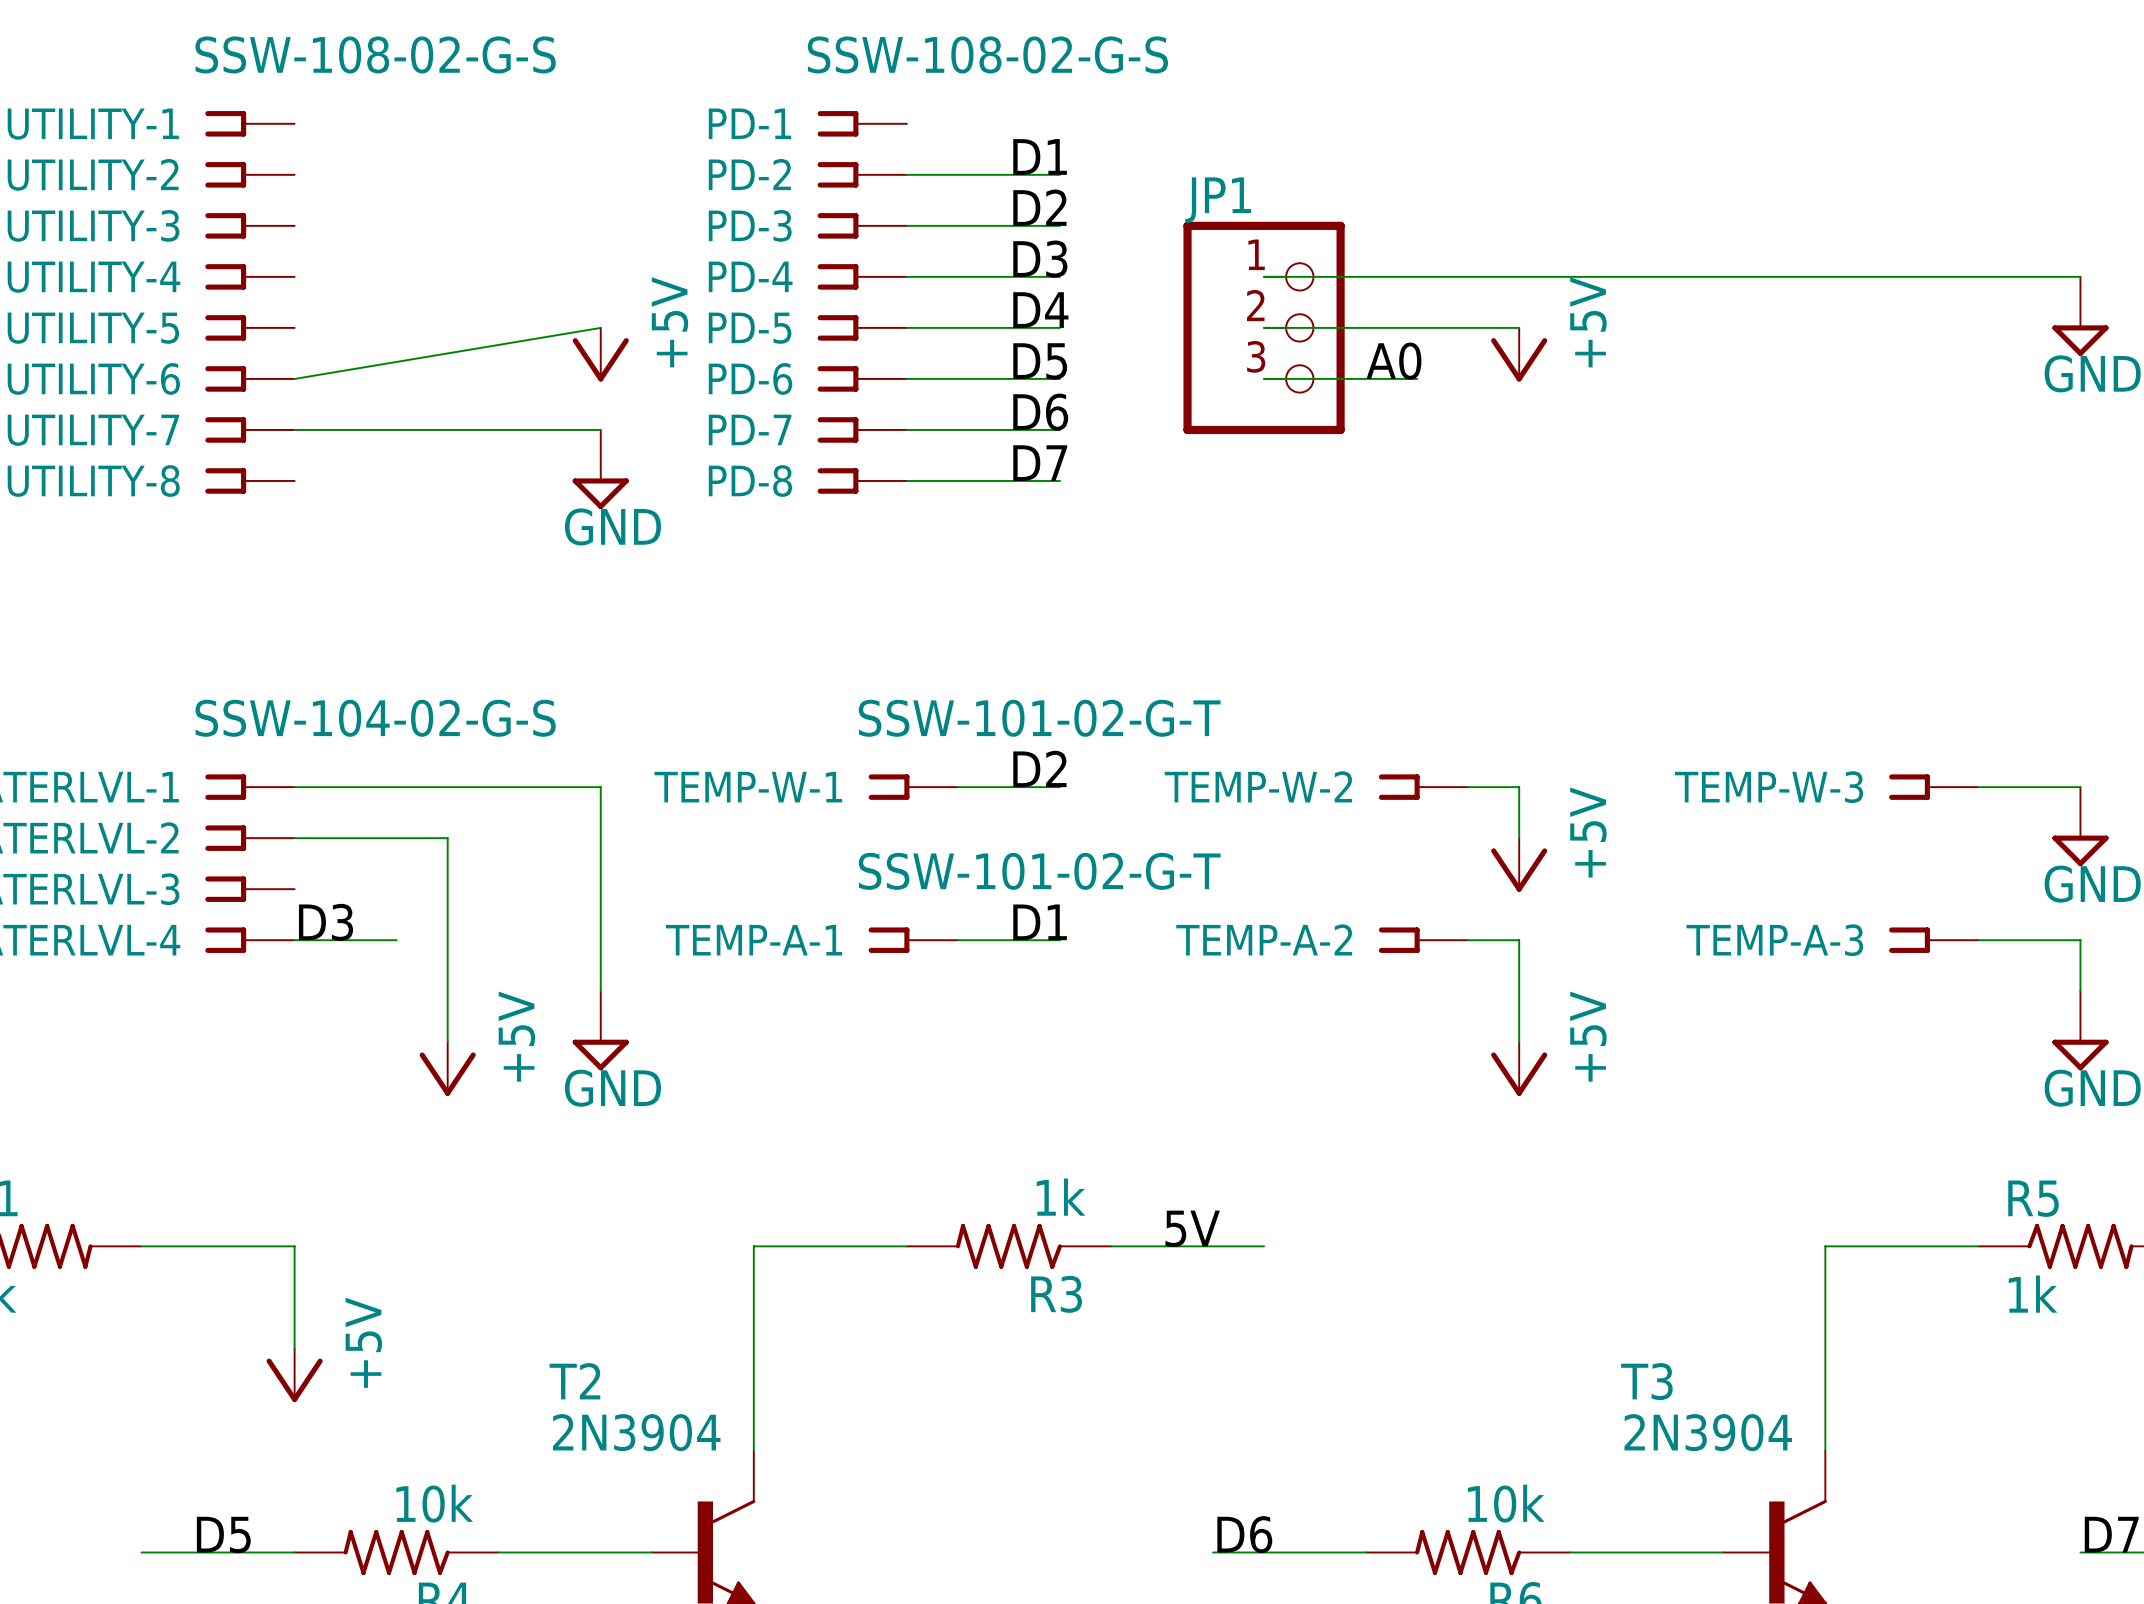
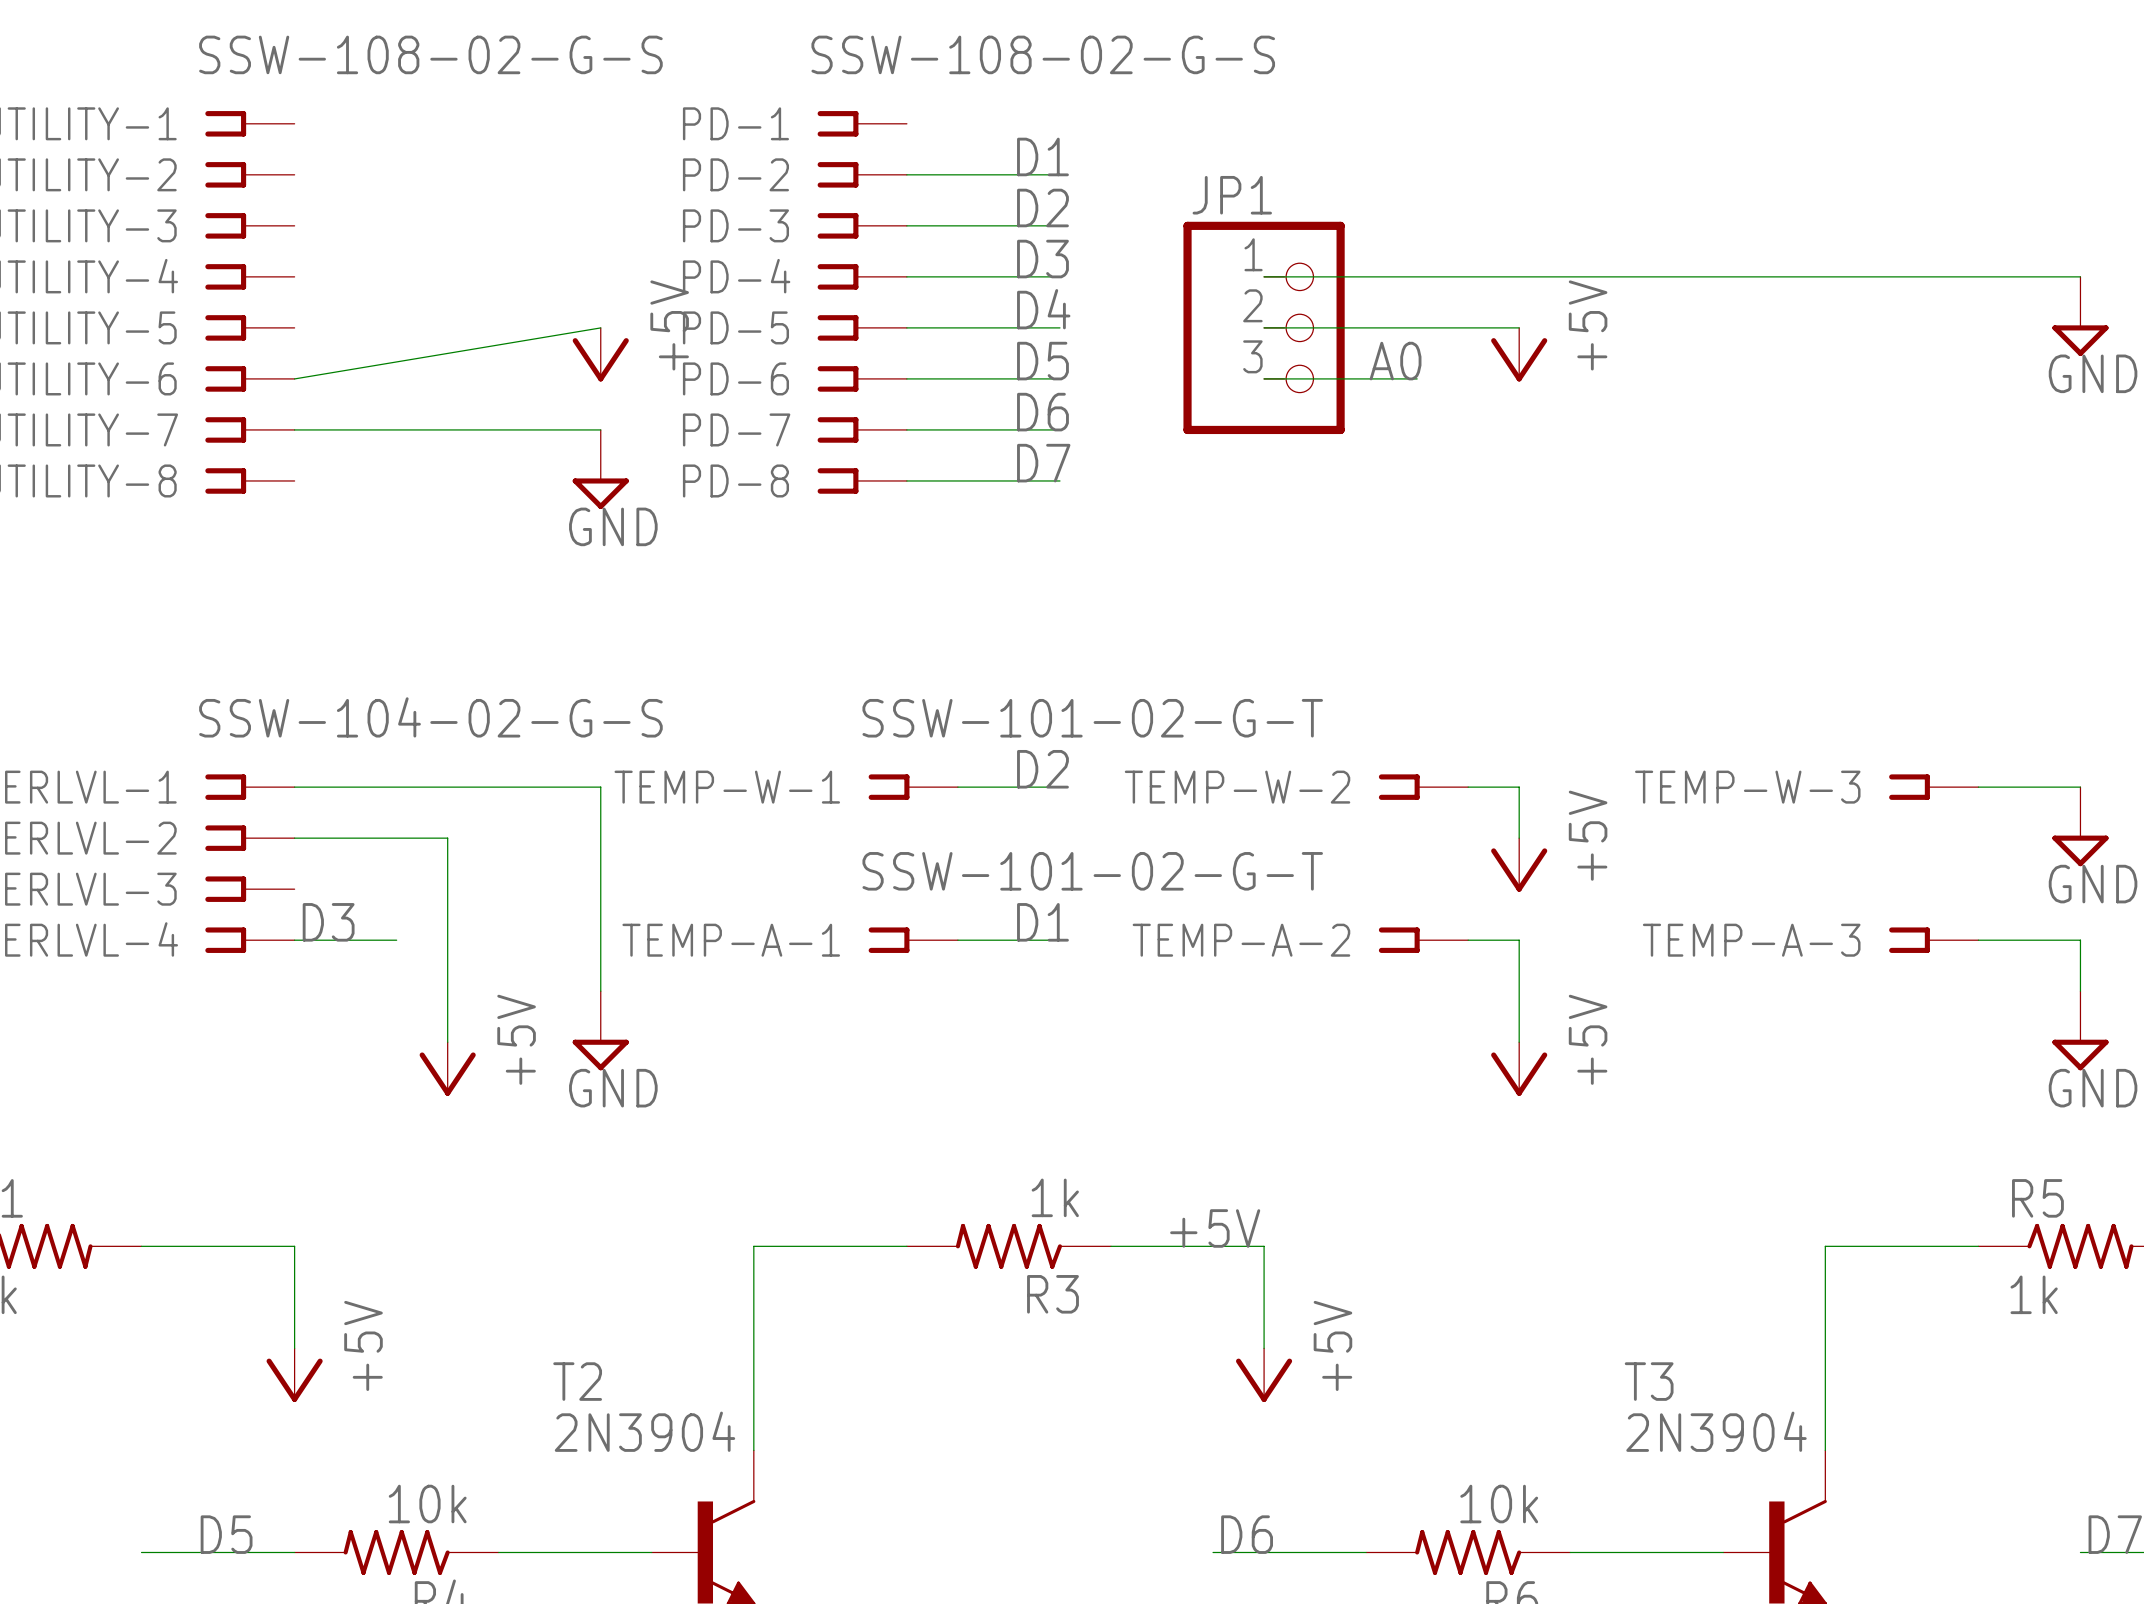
label: 5V (1192, 1228) -> +5V (1215, 1228)
wire: none -> (1264, 1246) (1264, 1348)
power symbol: none -> +5V (1264, 1375)

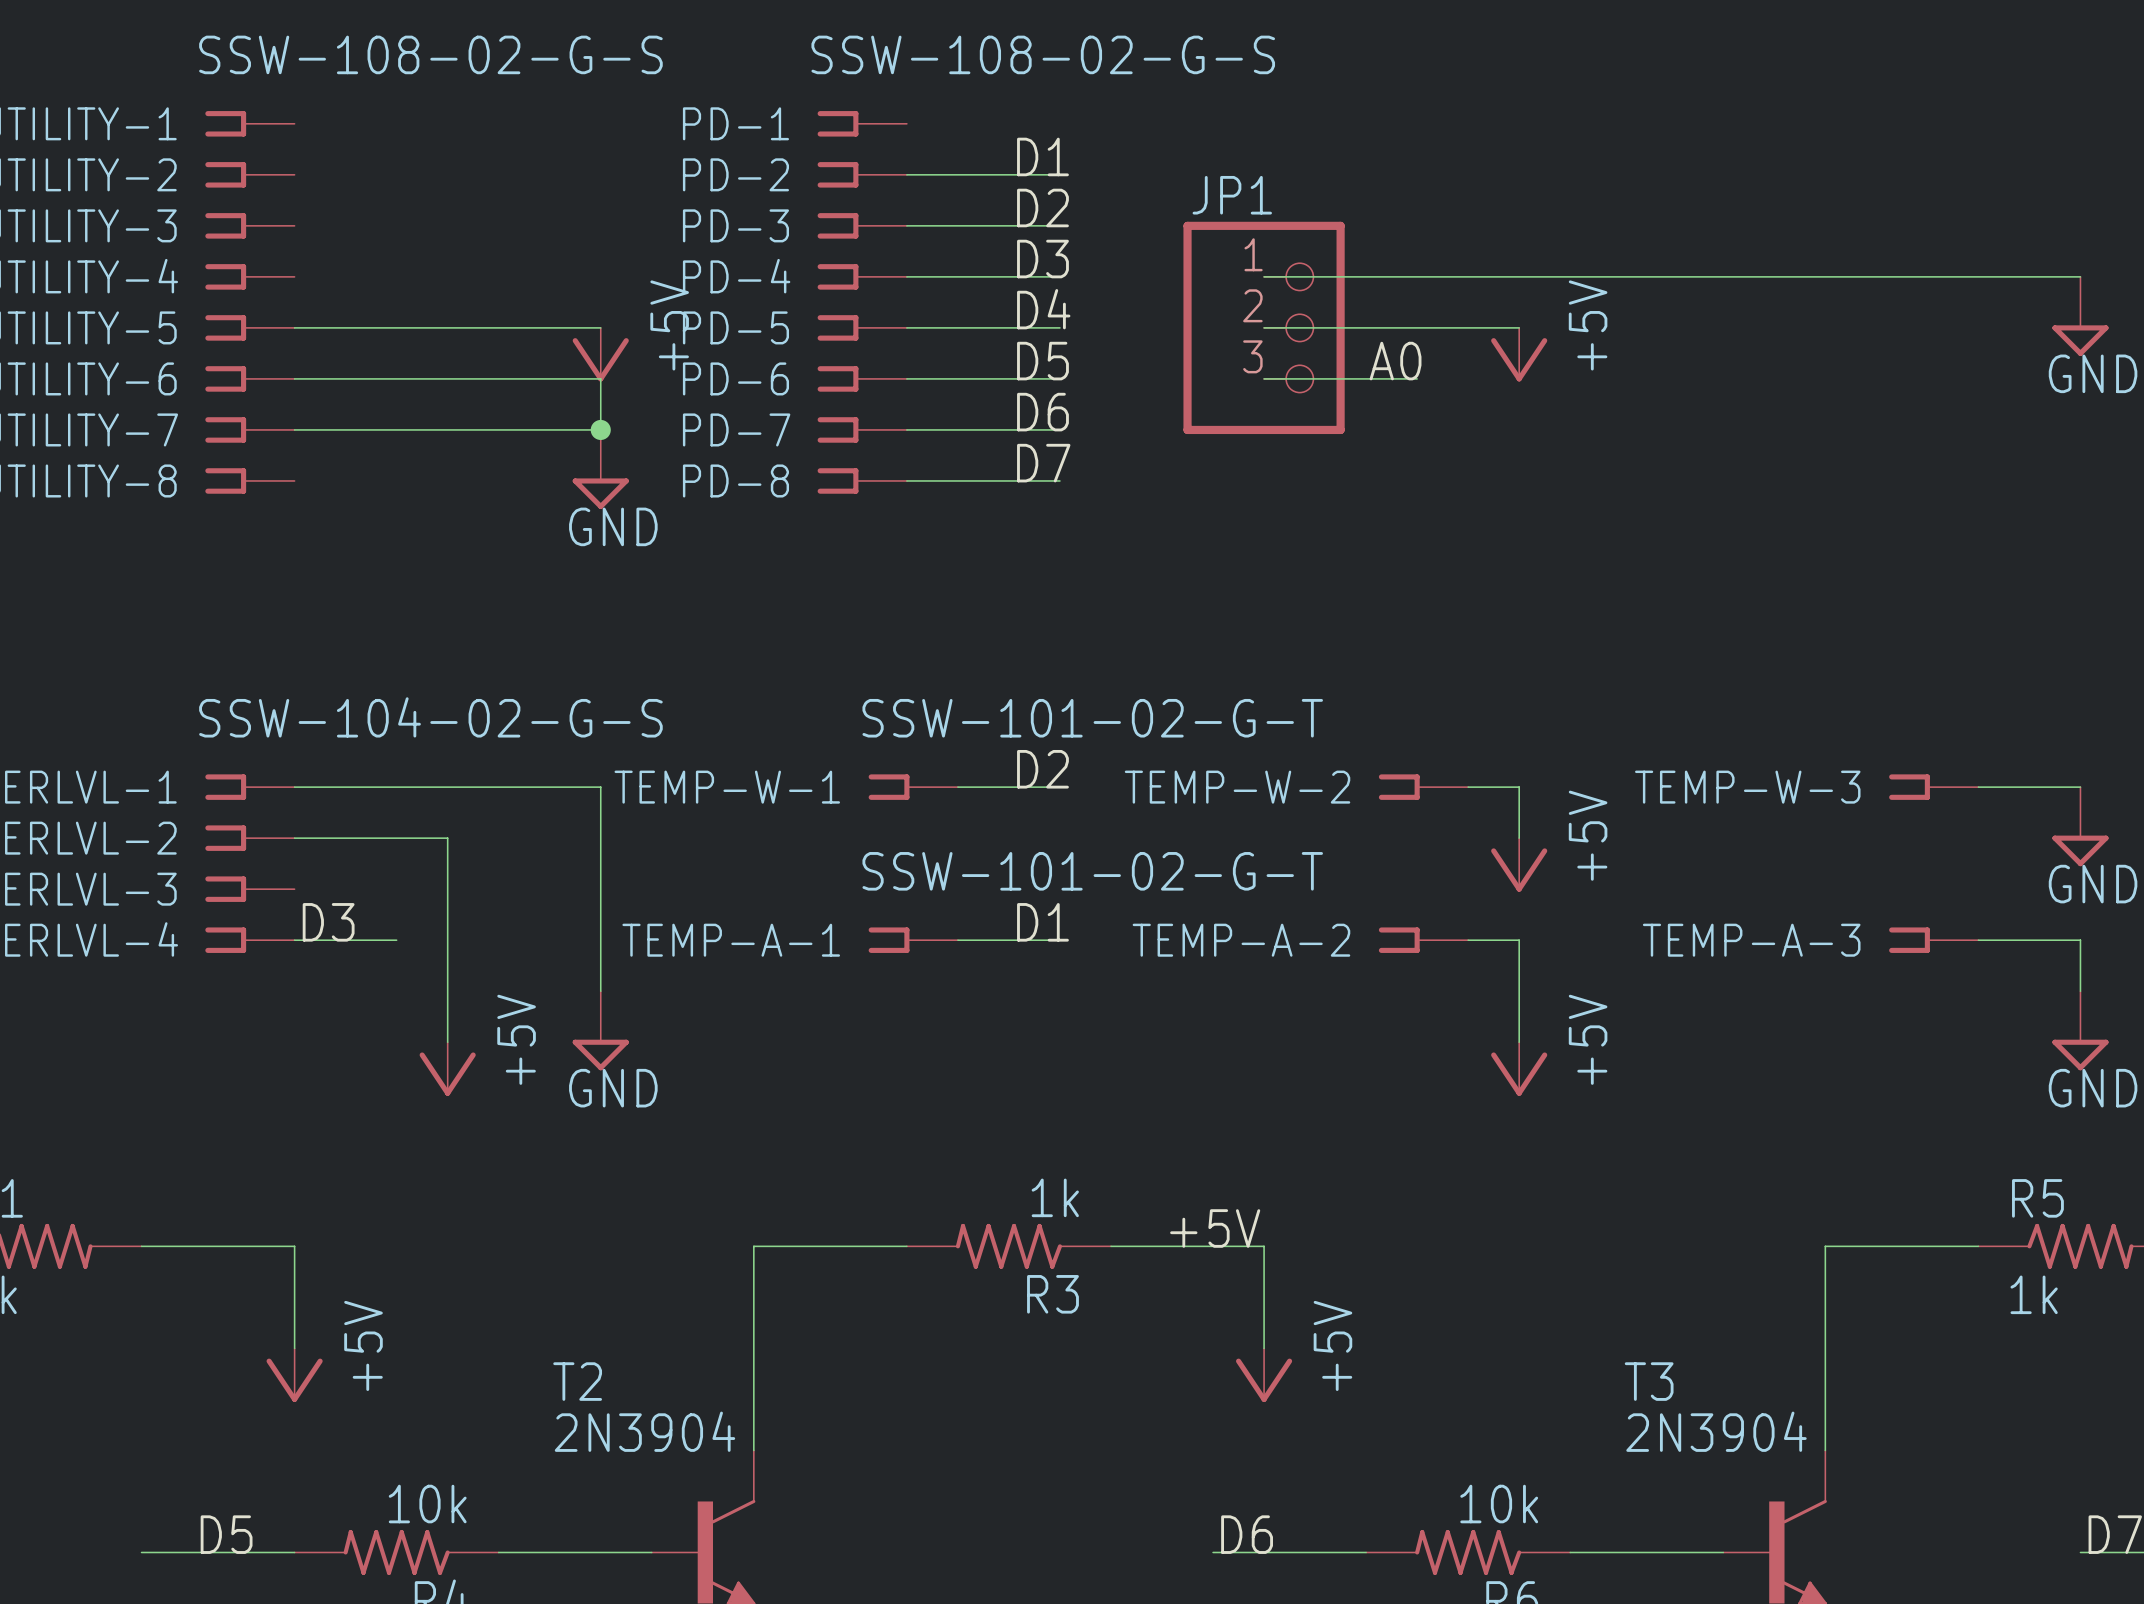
wire: (600, 327) (294, 378) -> (600, 327) (294, 327)
wire: none -> (294, 378) (600, 378) (600, 429)
junction: none -> (600, 429)

